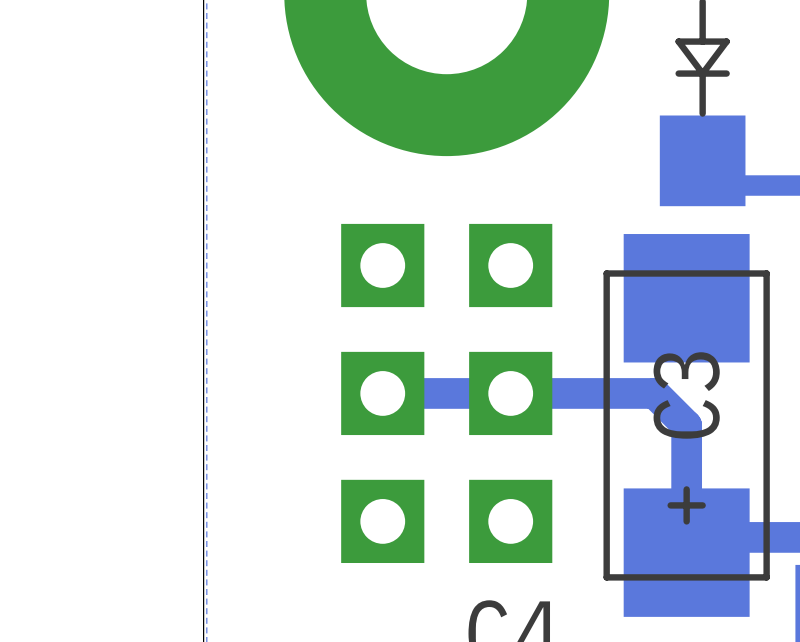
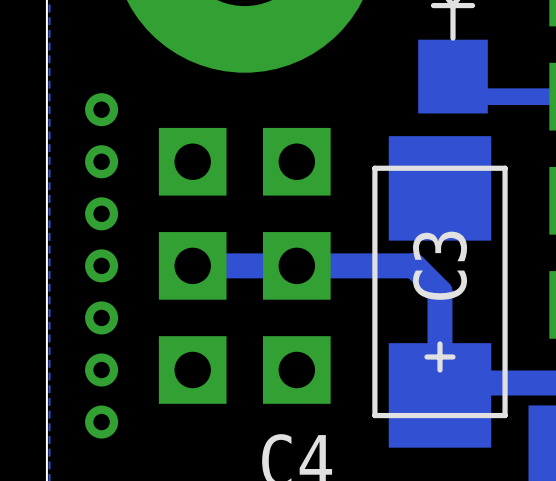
via: none -> (101, 109)
via: none -> (101, 161)
via: none -> (101, 213)
via: none -> (101, 265)
via: none -> (101, 317)
via: none -> (101, 369)
via: none -> (101, 422)

